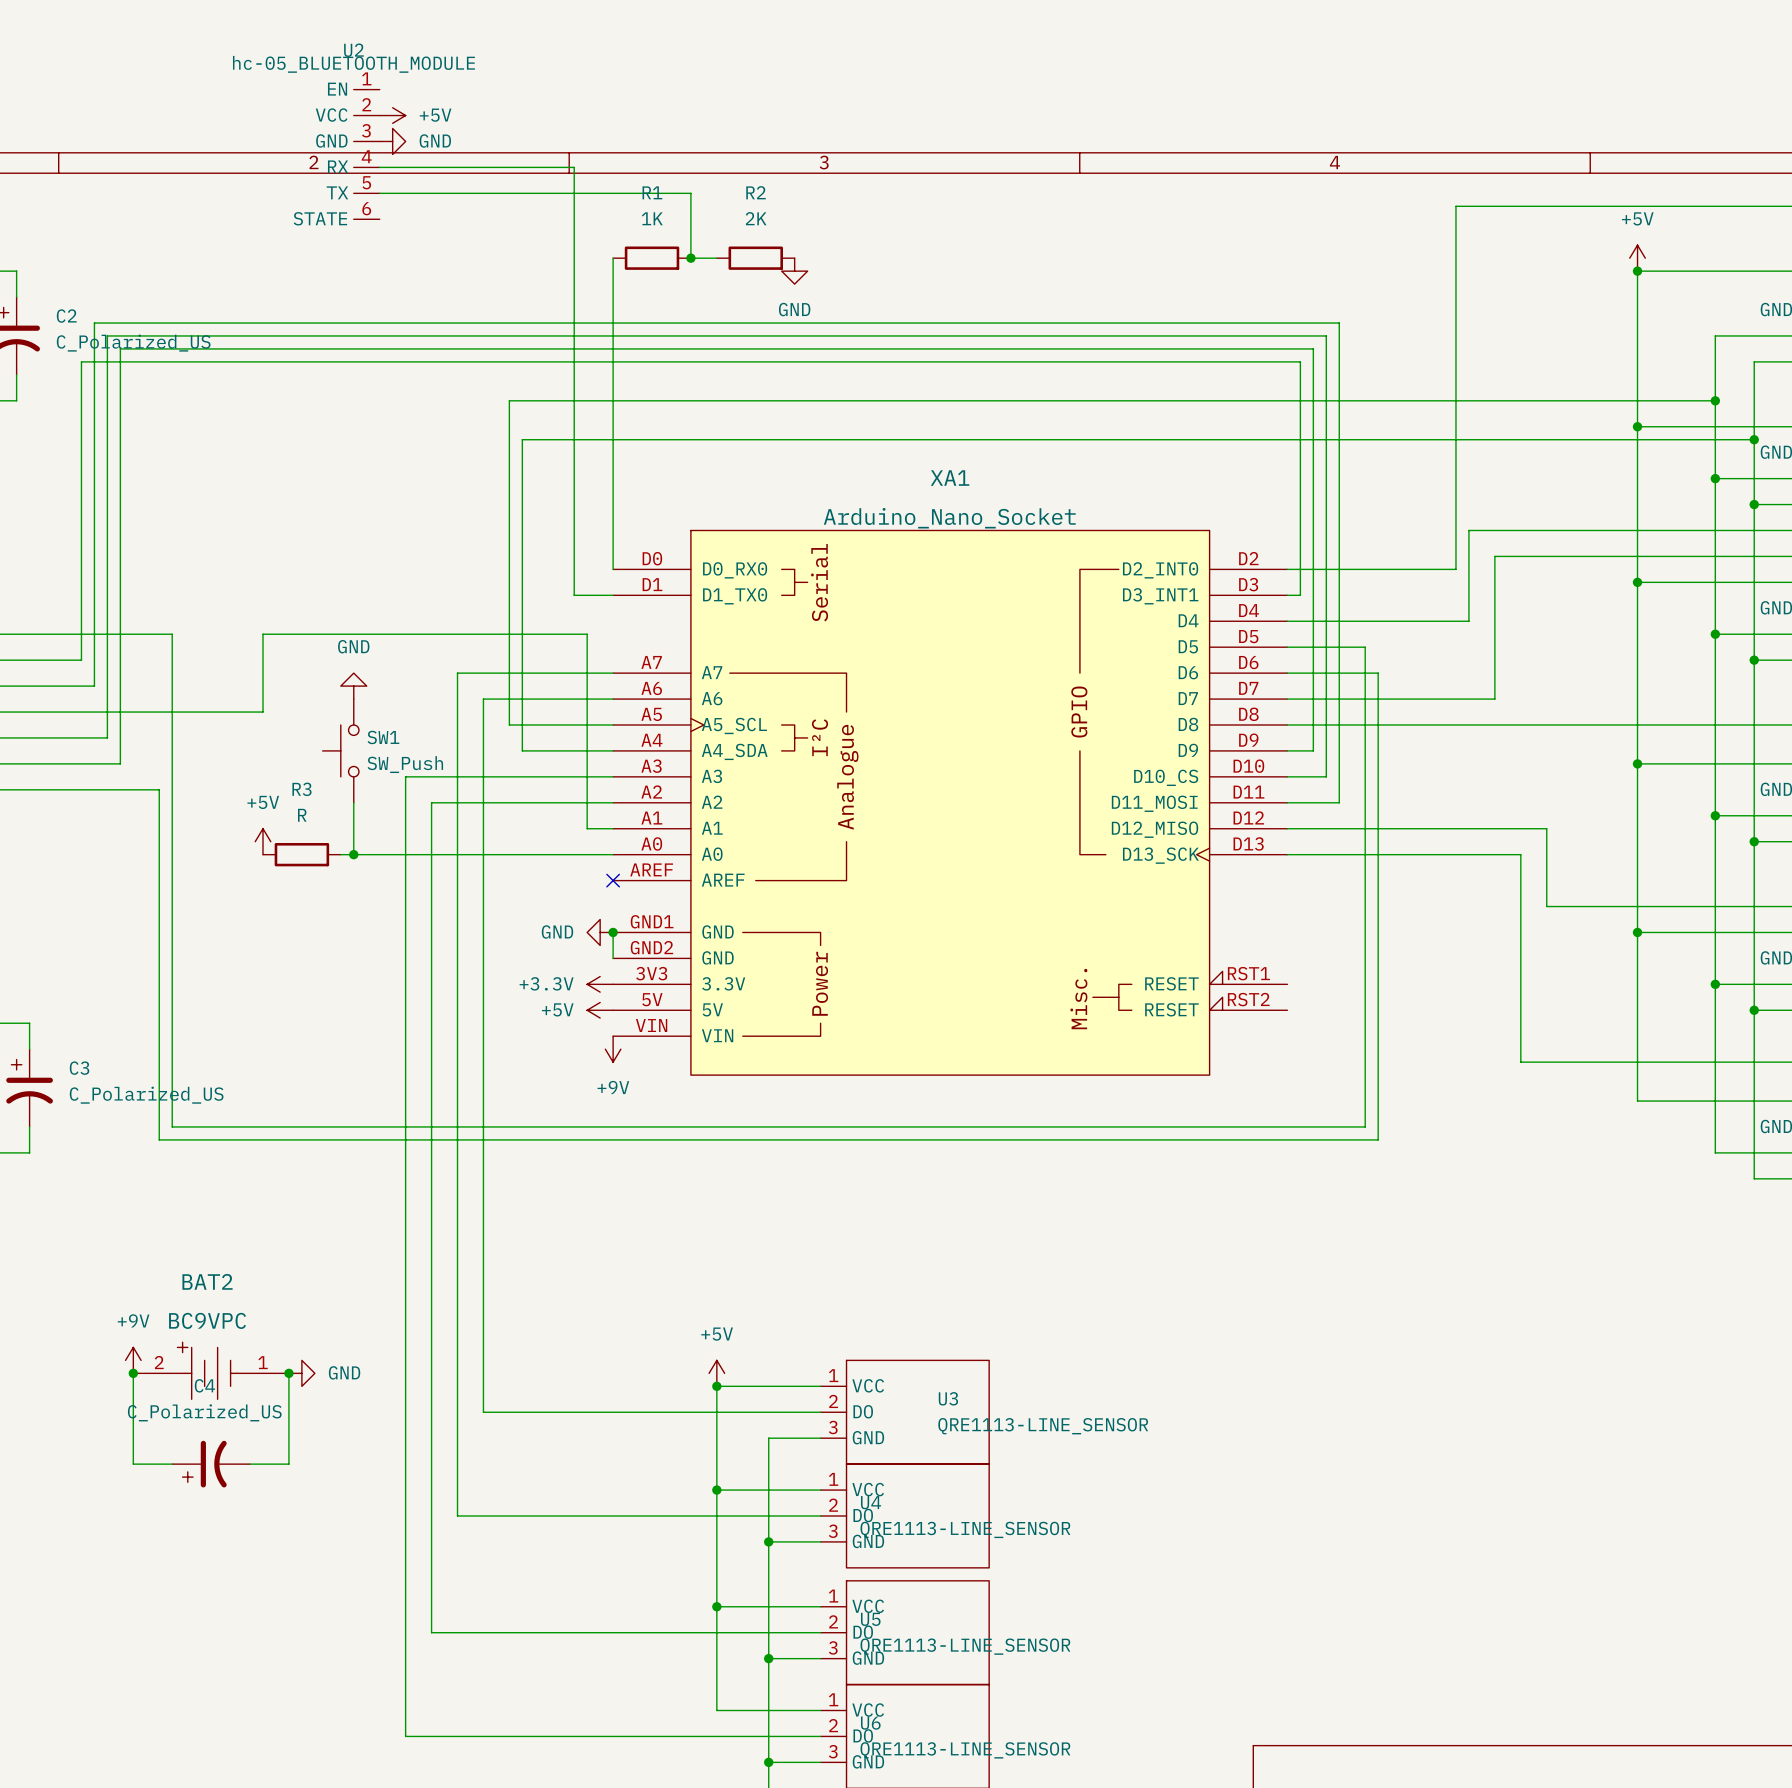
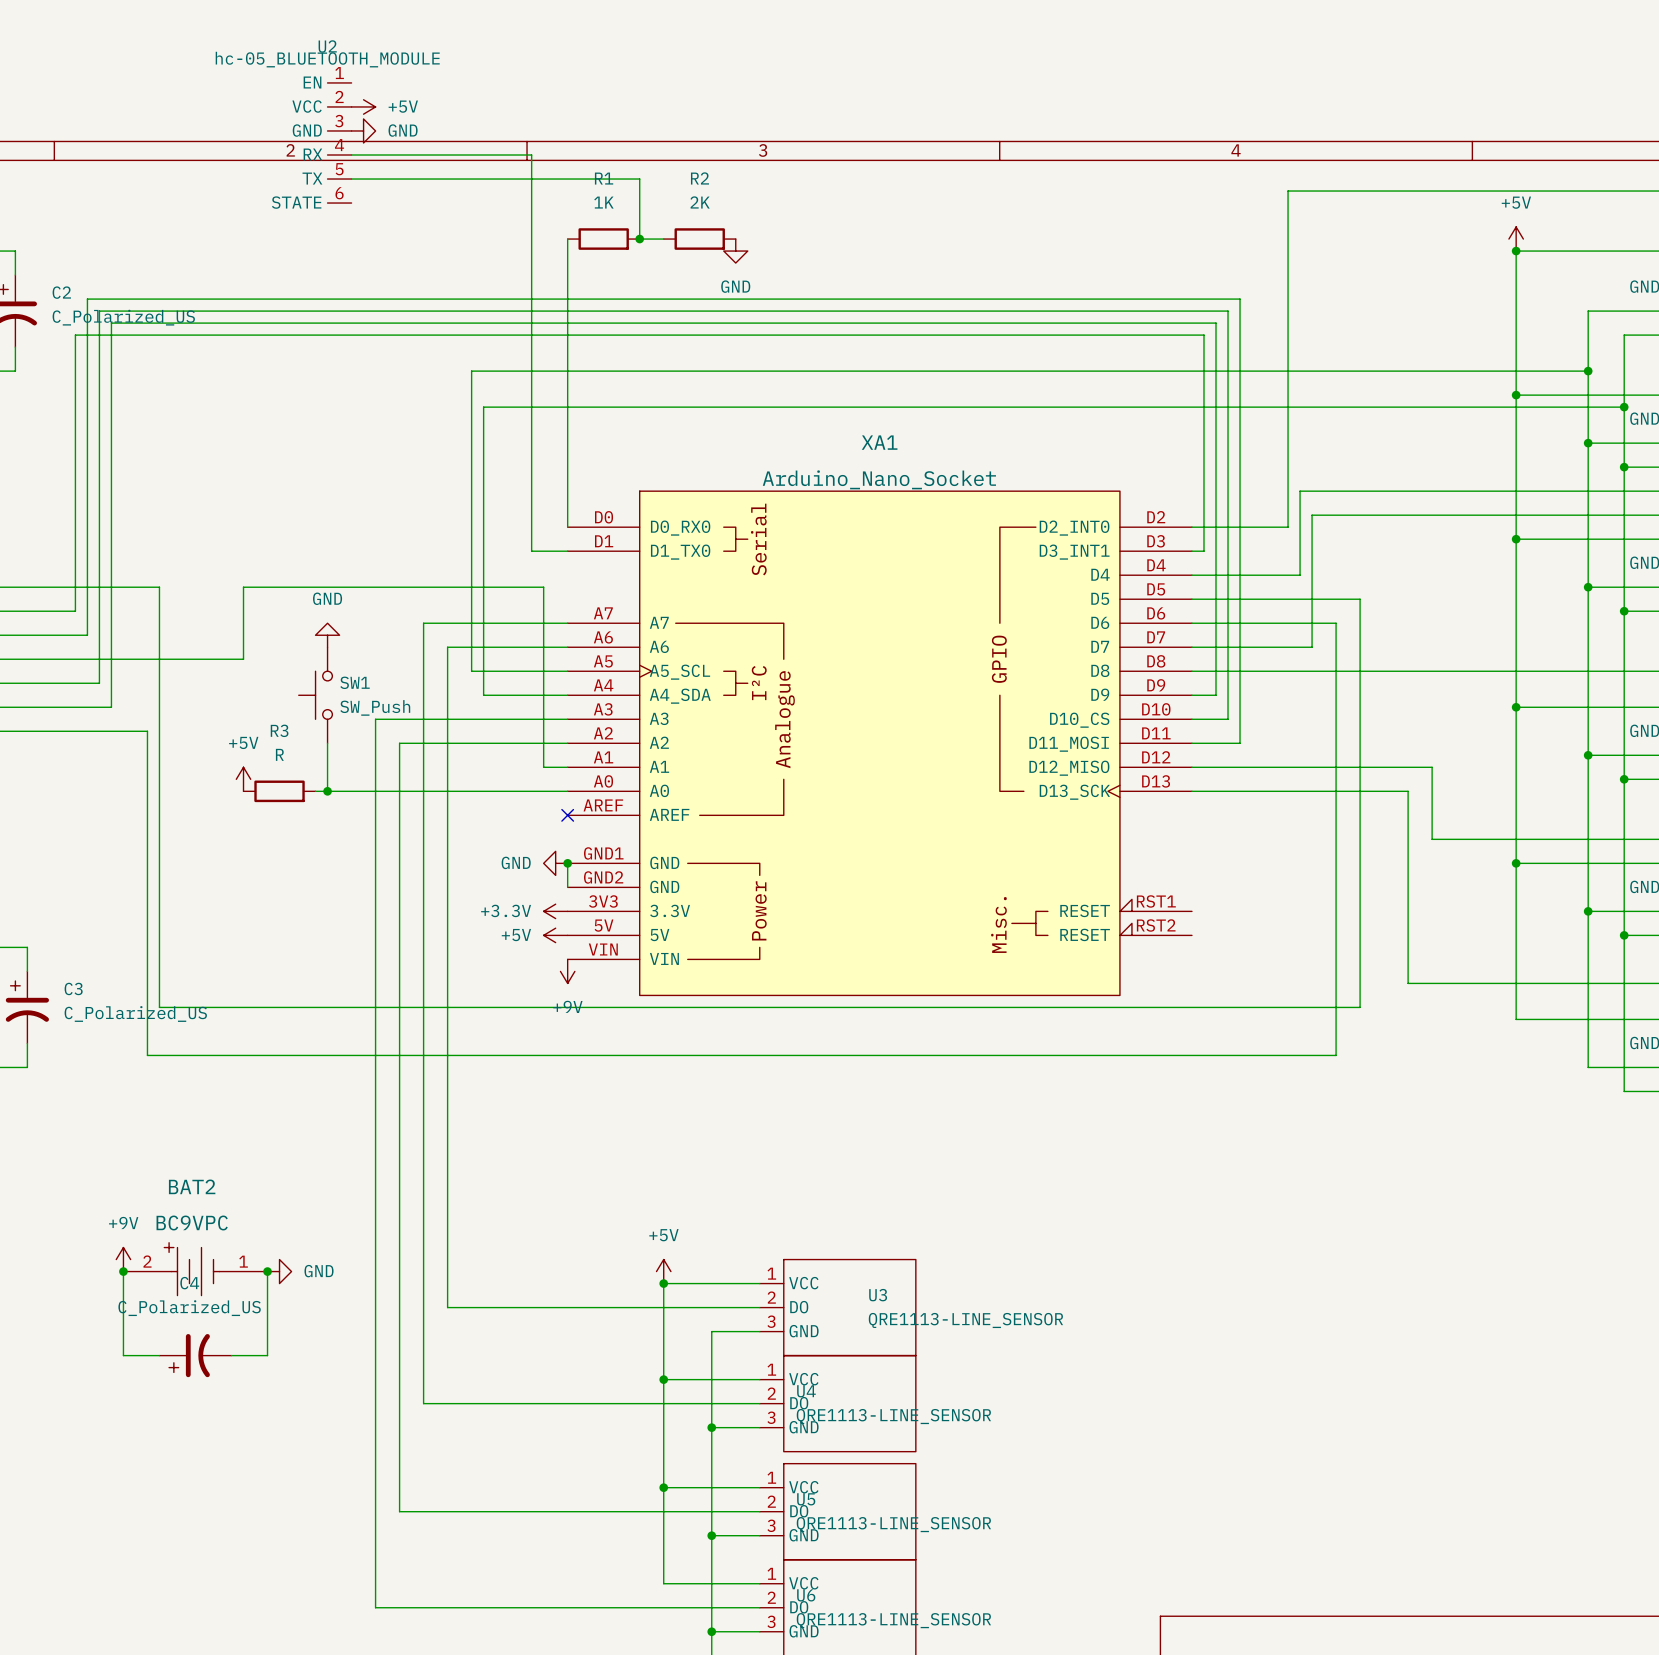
wire: (1455, 206) (1455, 569) (1391, 569) -> (1348, 191) (1288, 191) (1288, 527)
wire: (1468, 530) (1468, 621) (1404, 621) -> (1360, 491) (1300, 491) (1300, 575)
wire: (1494, 556) (1494, 699) (1417, 699) -> (1384, 515) (1312, 515) (1312, 647)
wire: (1365, 647) (1365, 1126) (172, 1126) (172, 1088) -> (1264, 599) (1360, 599) (1360, 1007) (159, 1007)
wire: (1378, 673) (1378, 1139) -> (1276, 623) (1336, 623) (1336, 1055) (1276, 1055)

